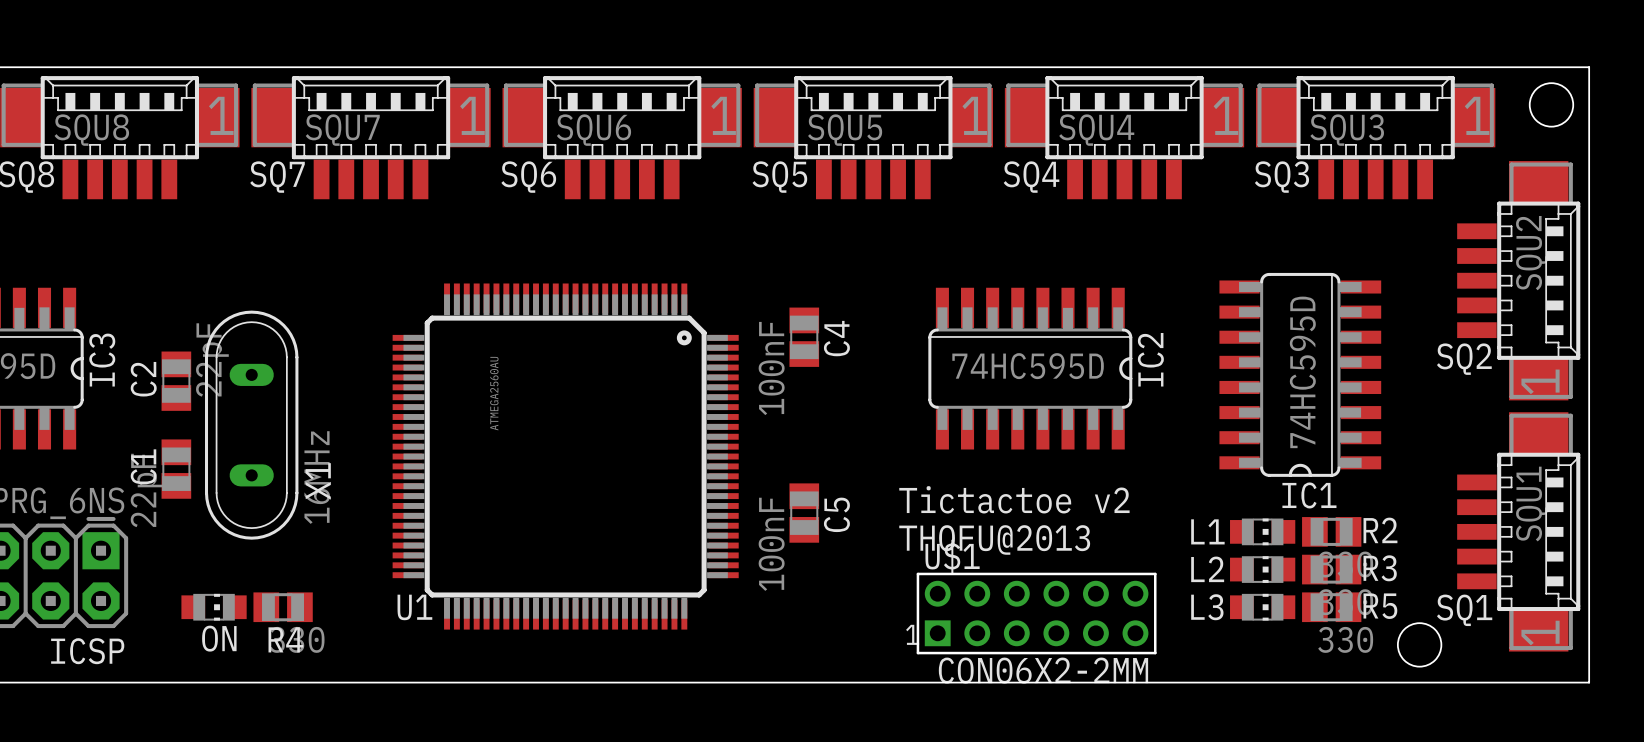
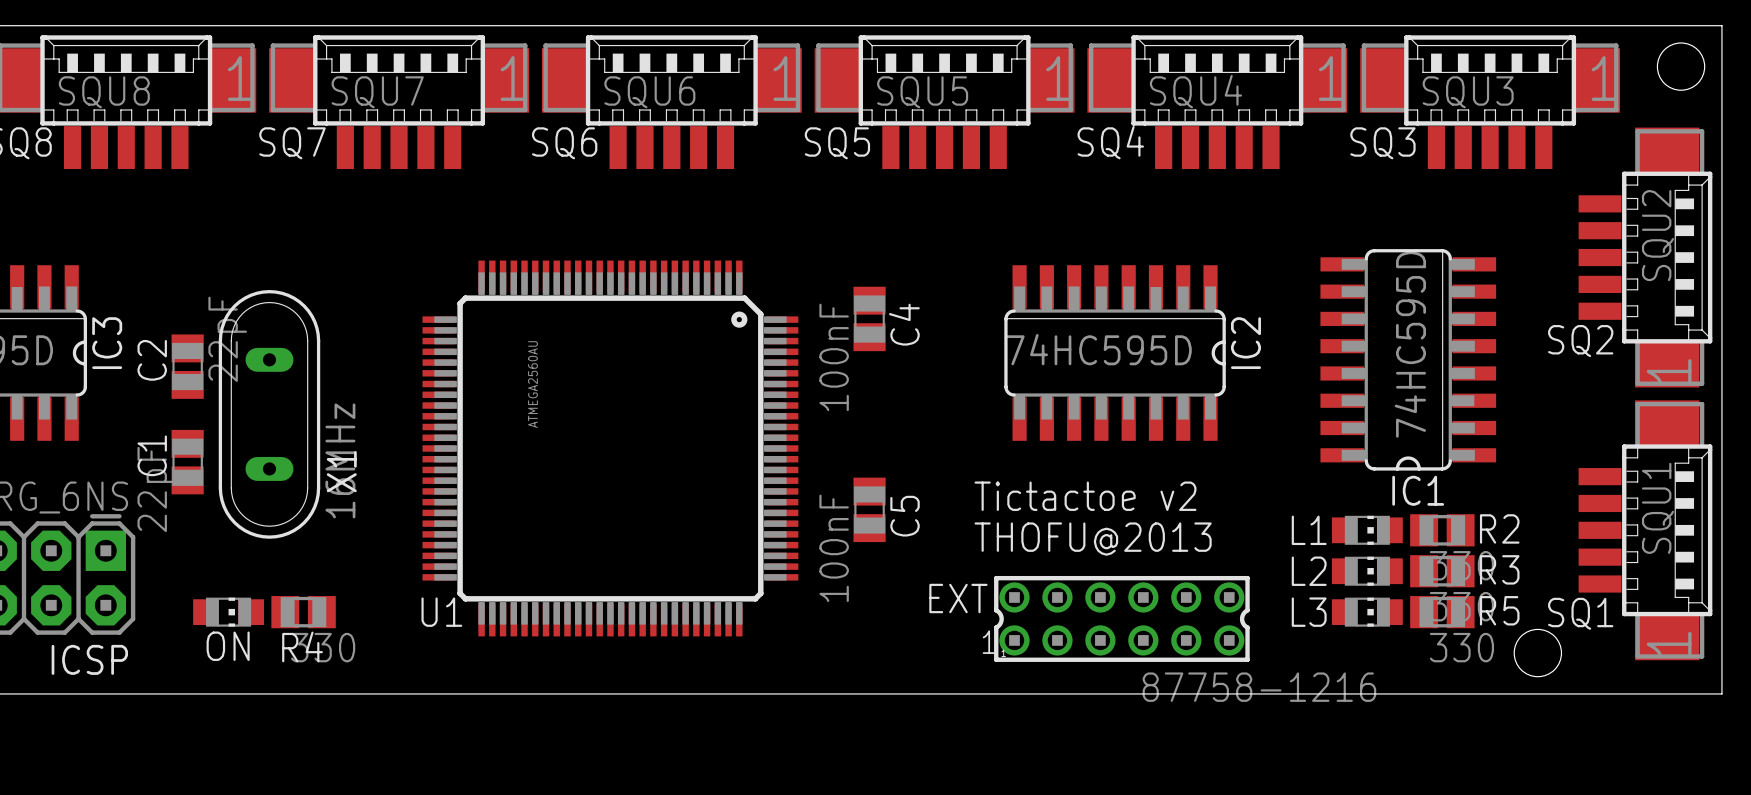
U$1: CON06X2-2MM (1036, 613) -> none
EXT: none -> 87758-1216 (1121, 618)

